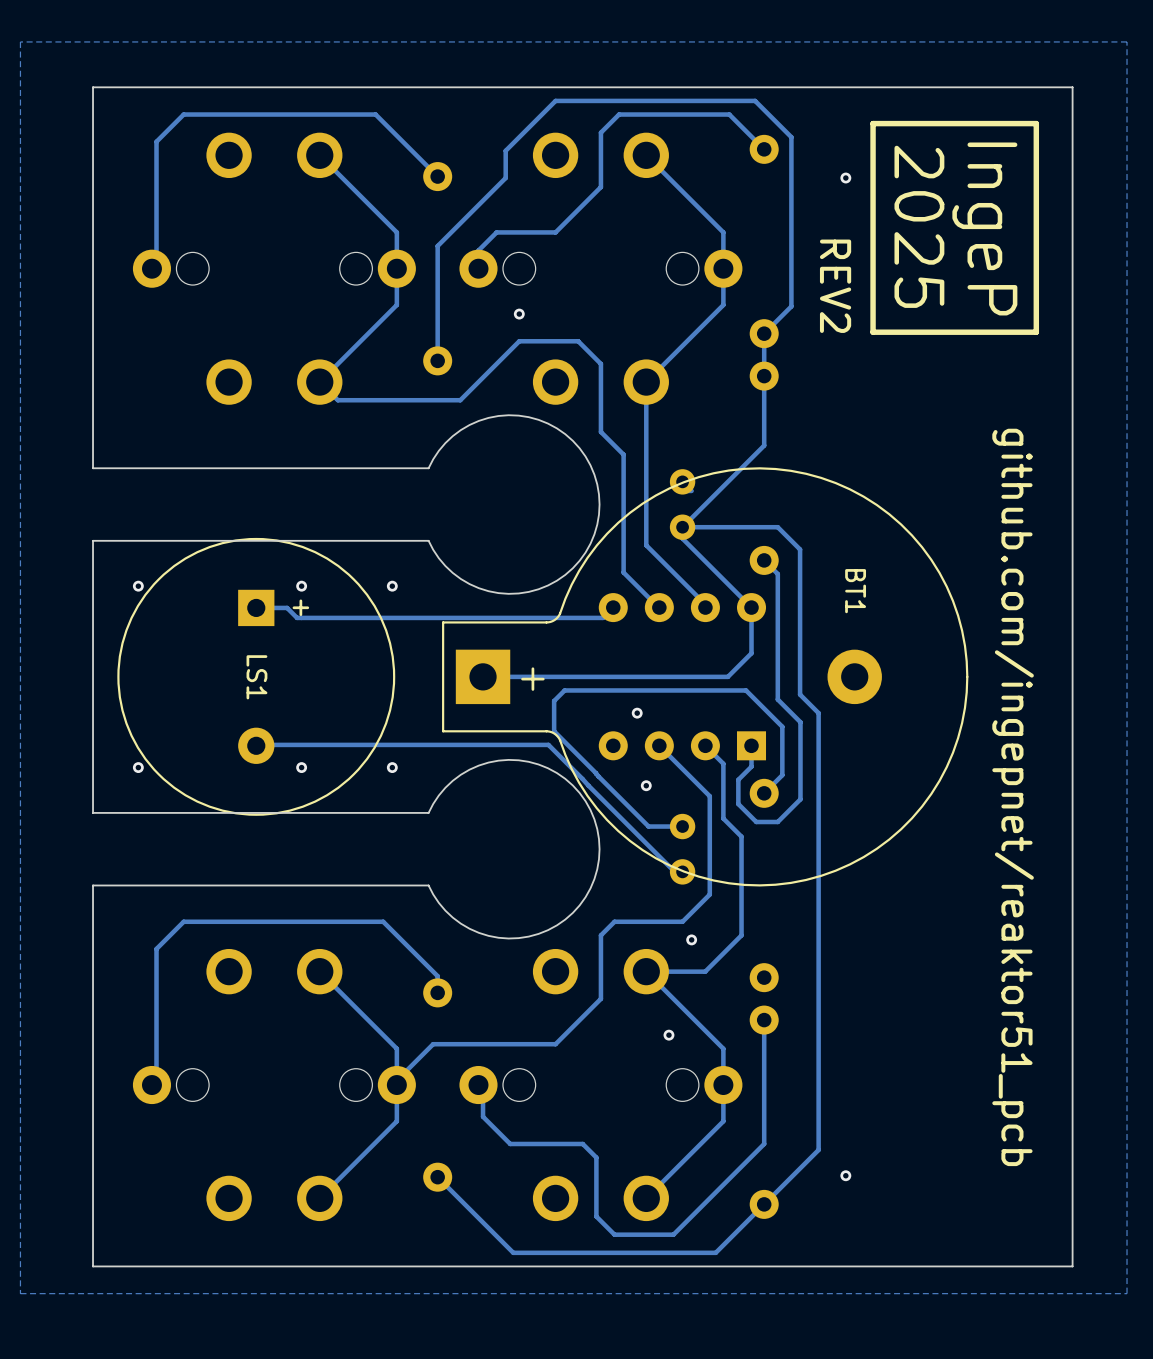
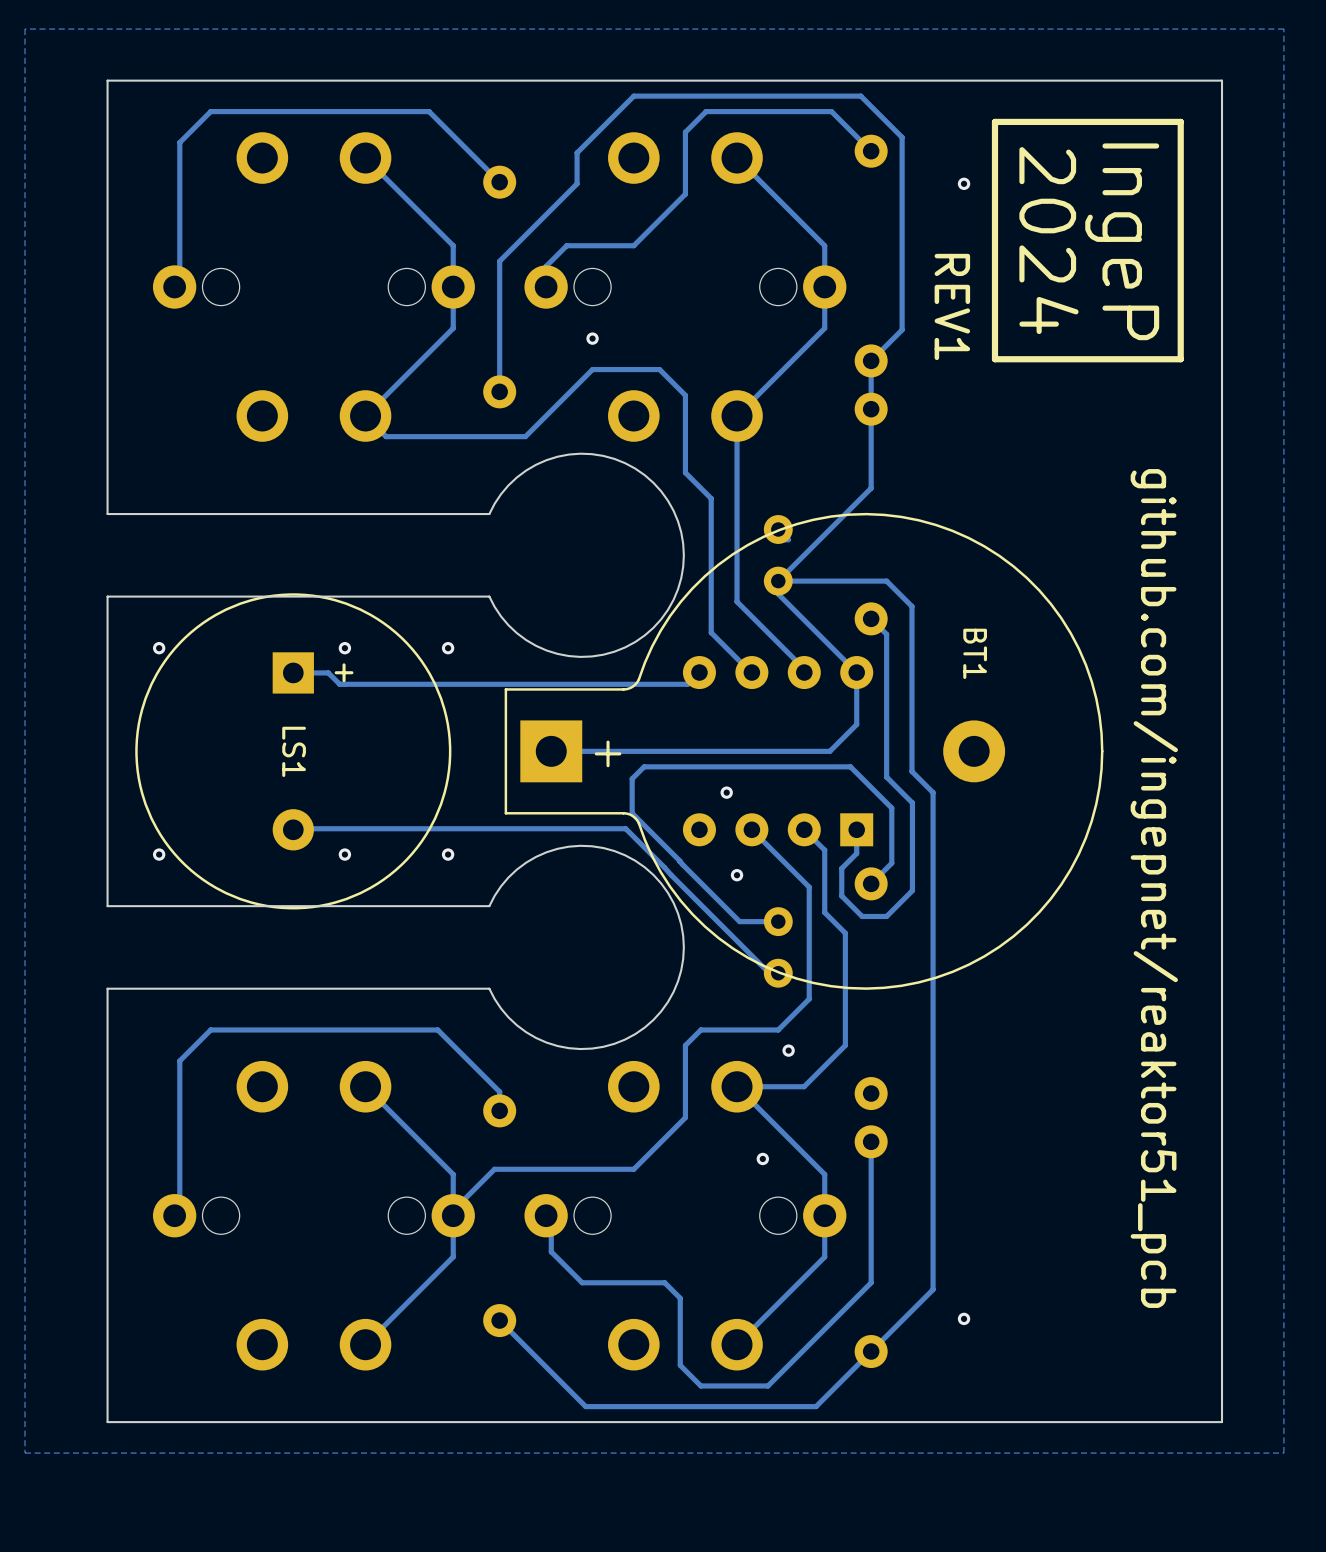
text: 2025 (919, 226) -> 2024 (1048, 240)
text: REV2 (835, 286) -> REV1 (952, 306)

